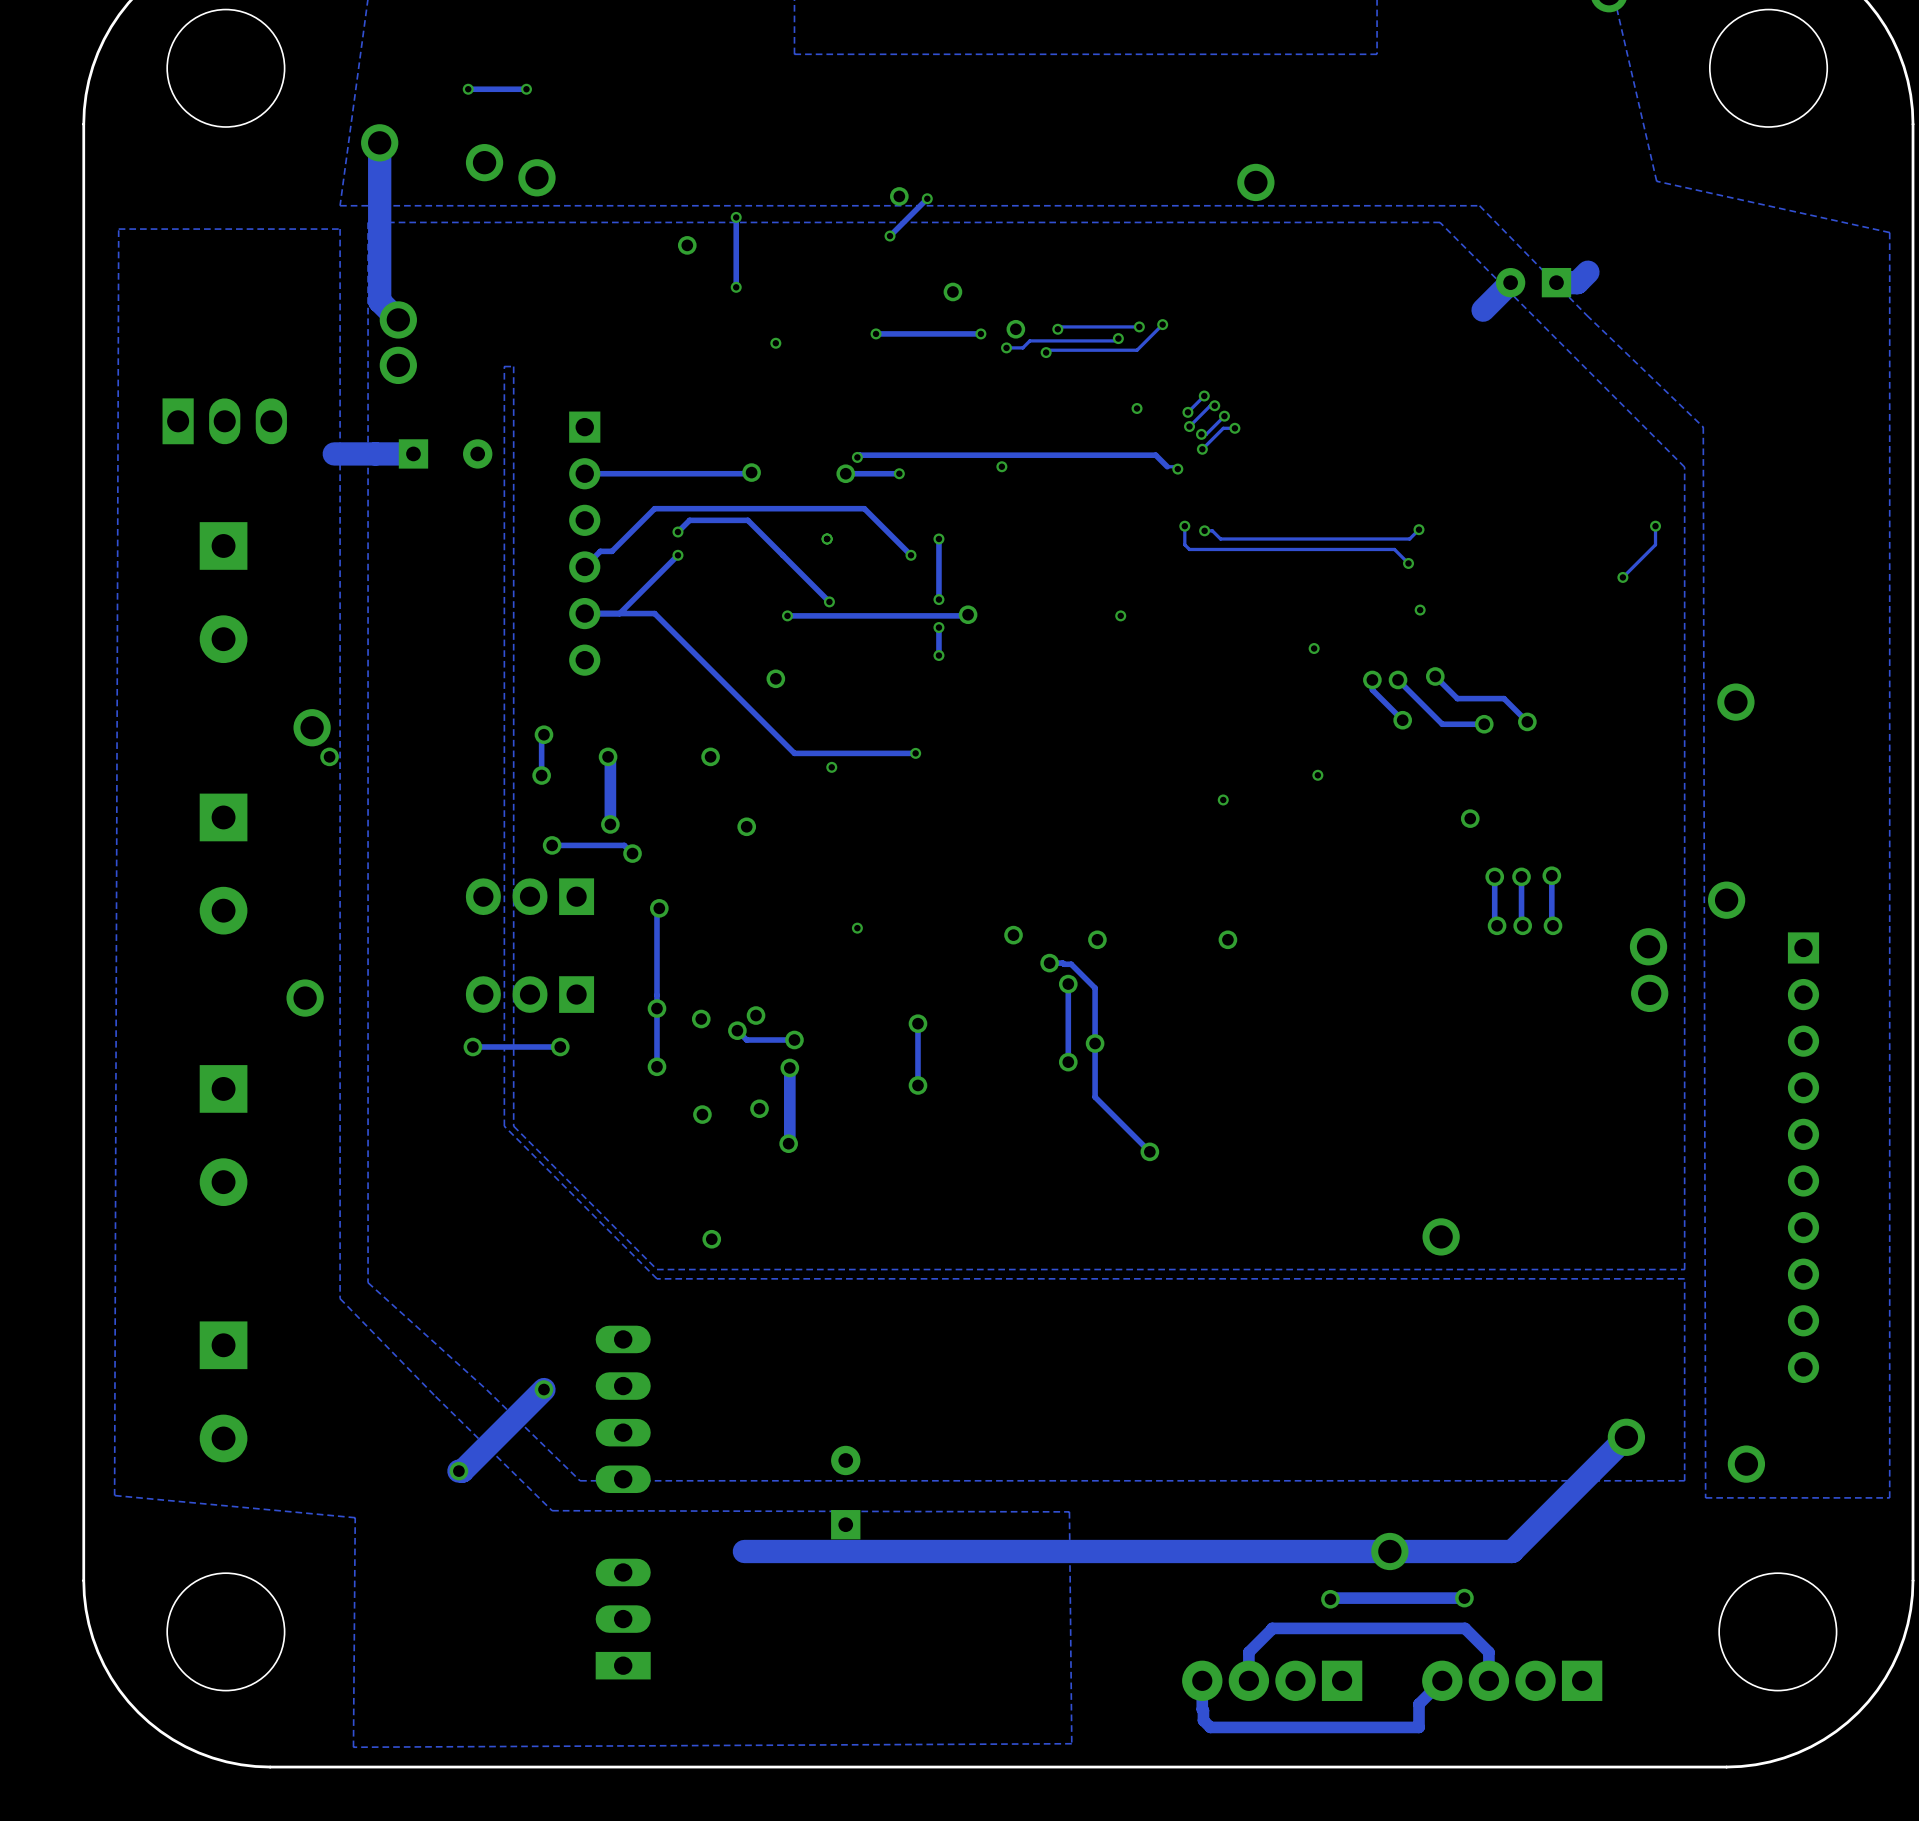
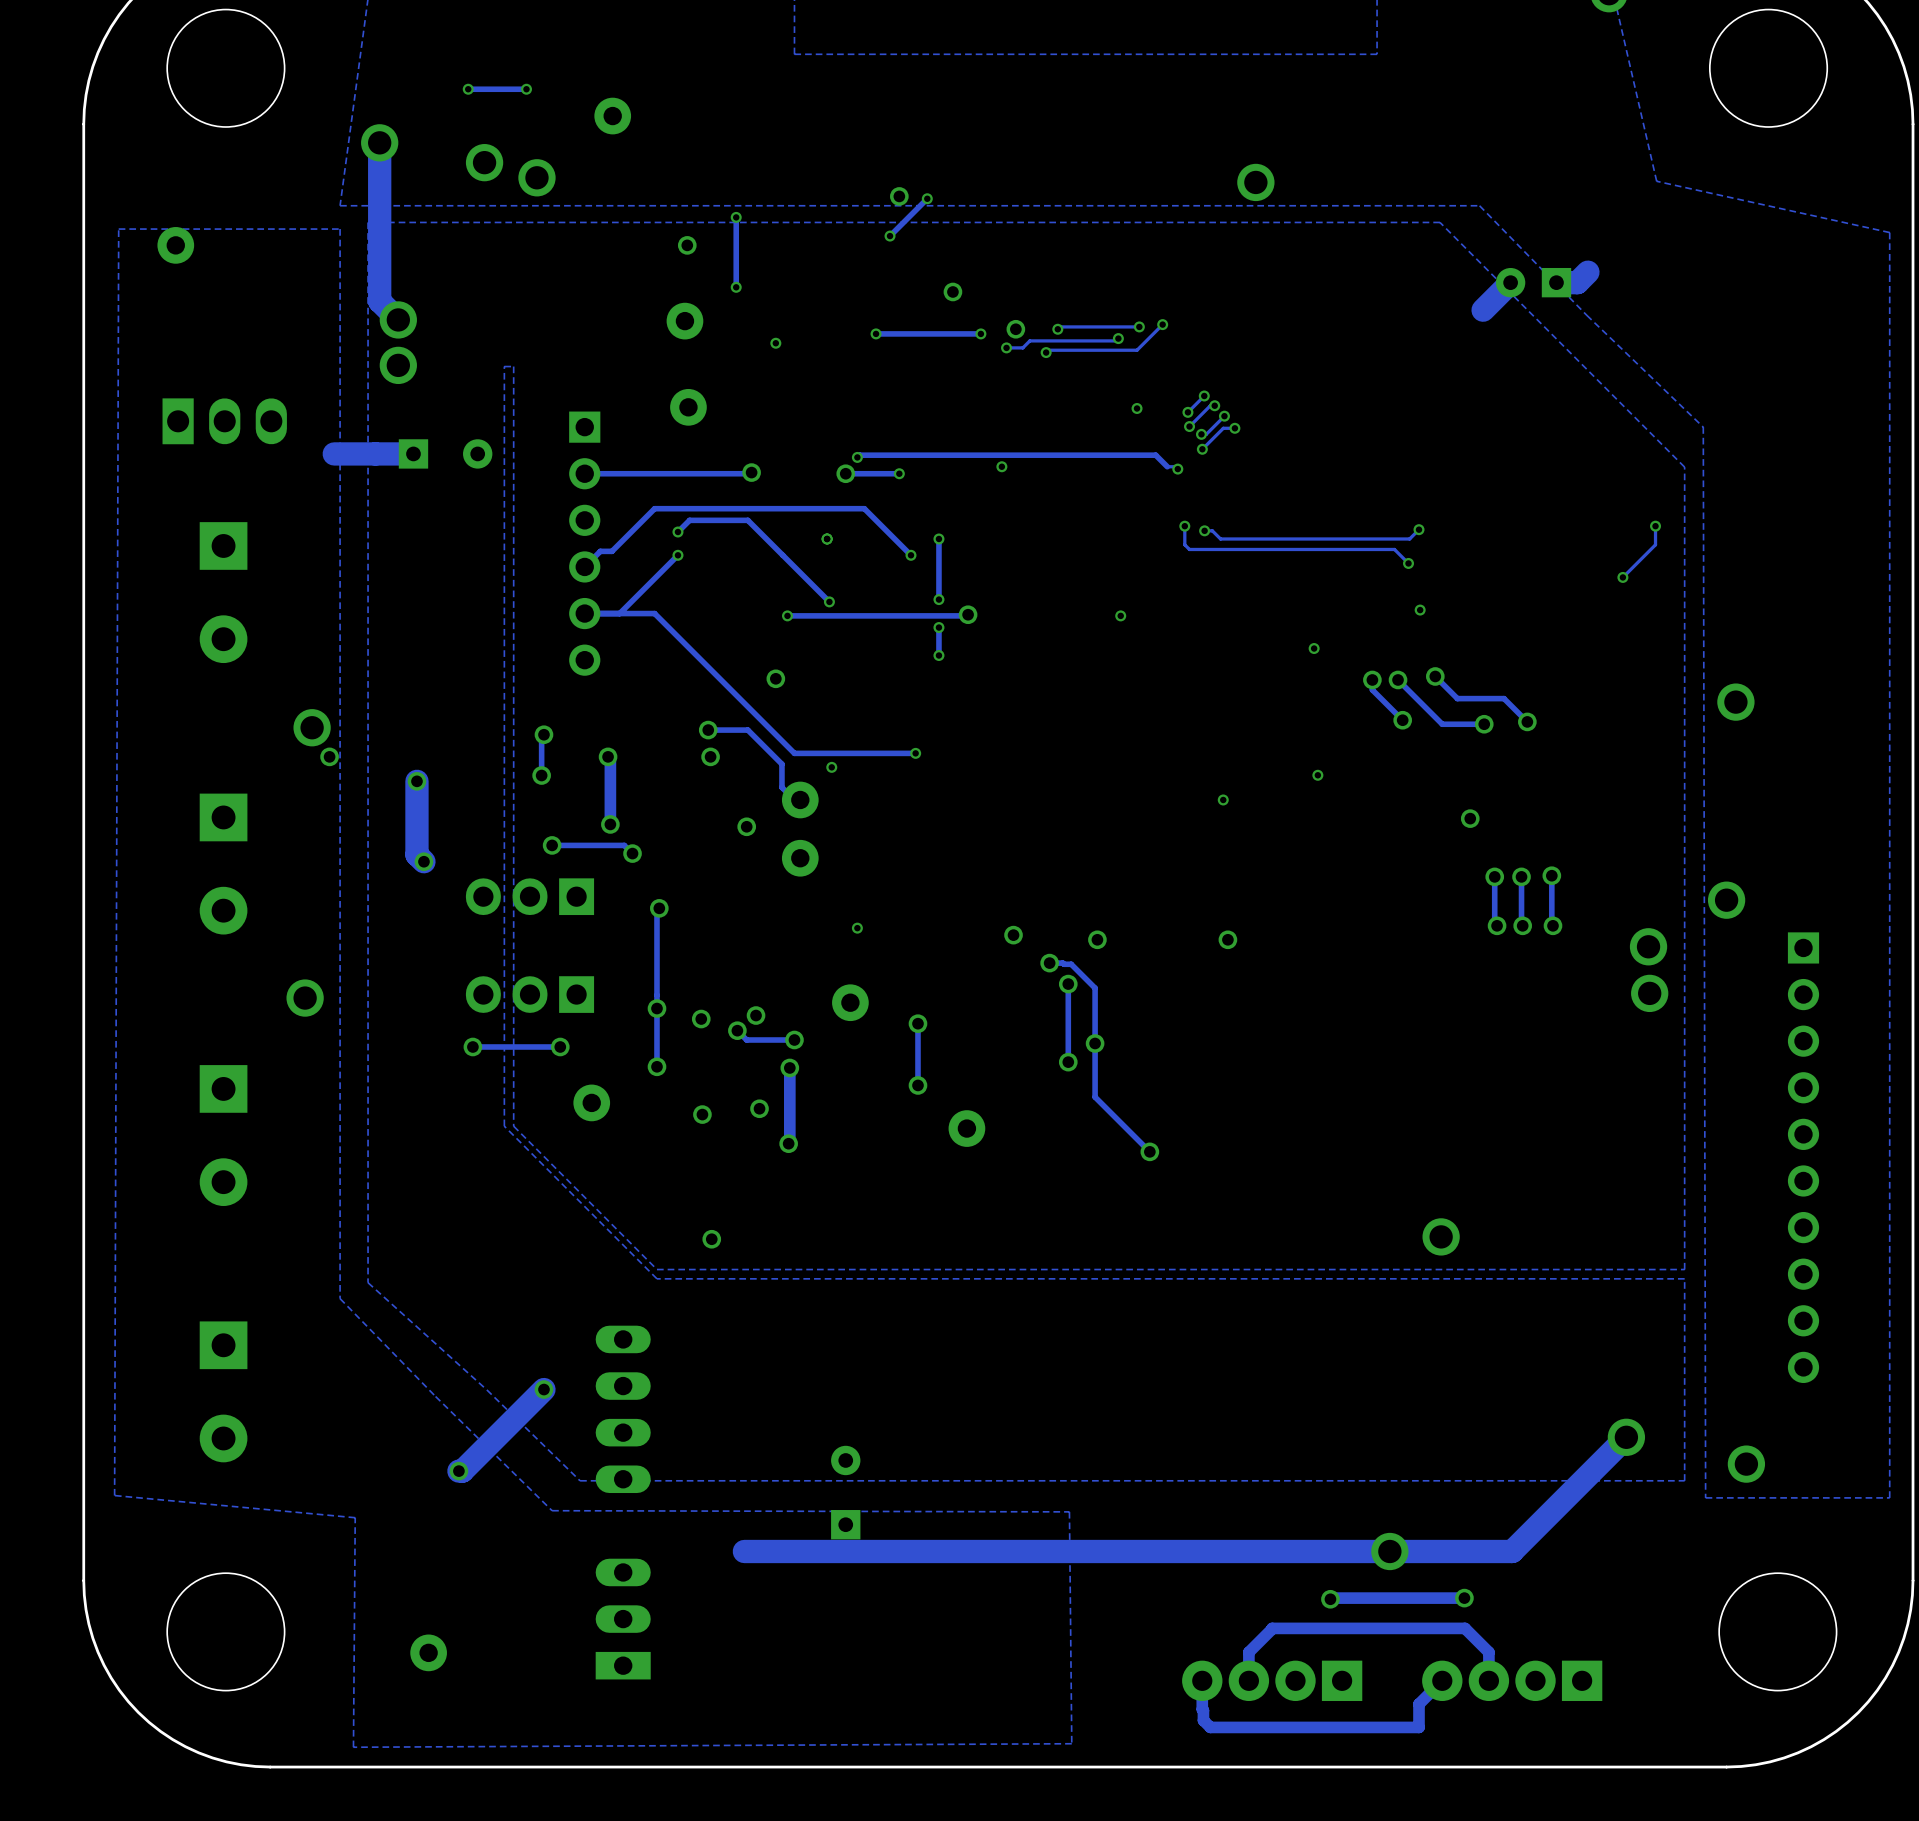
part: none -> (612, 116)
part: none -> (175, 245)
part: none -> (684, 321)
part: none -> (688, 407)
track: none -> (708, 730) (747, 730) (781, 764) (781, 787) (800, 805)
via: none -> (708, 730)
track: none -> (416, 781) (416, 854) (423, 861)
via: none -> (416, 781)
part: none -> (800, 799)
part: none -> (800, 858)
via: none -> (423, 861)
part: none -> (850, 1002)
part: none -> (591, 1102)
part: none -> (966, 1128)
part: none -> (428, 1652)

